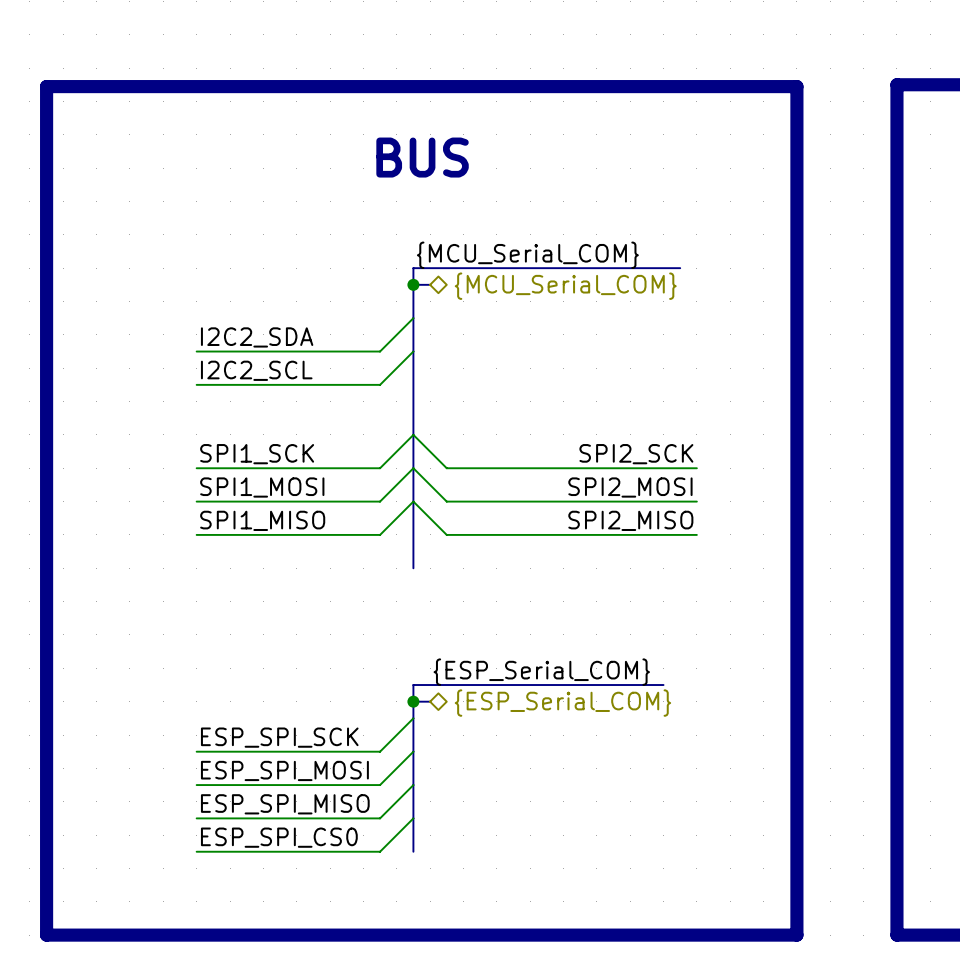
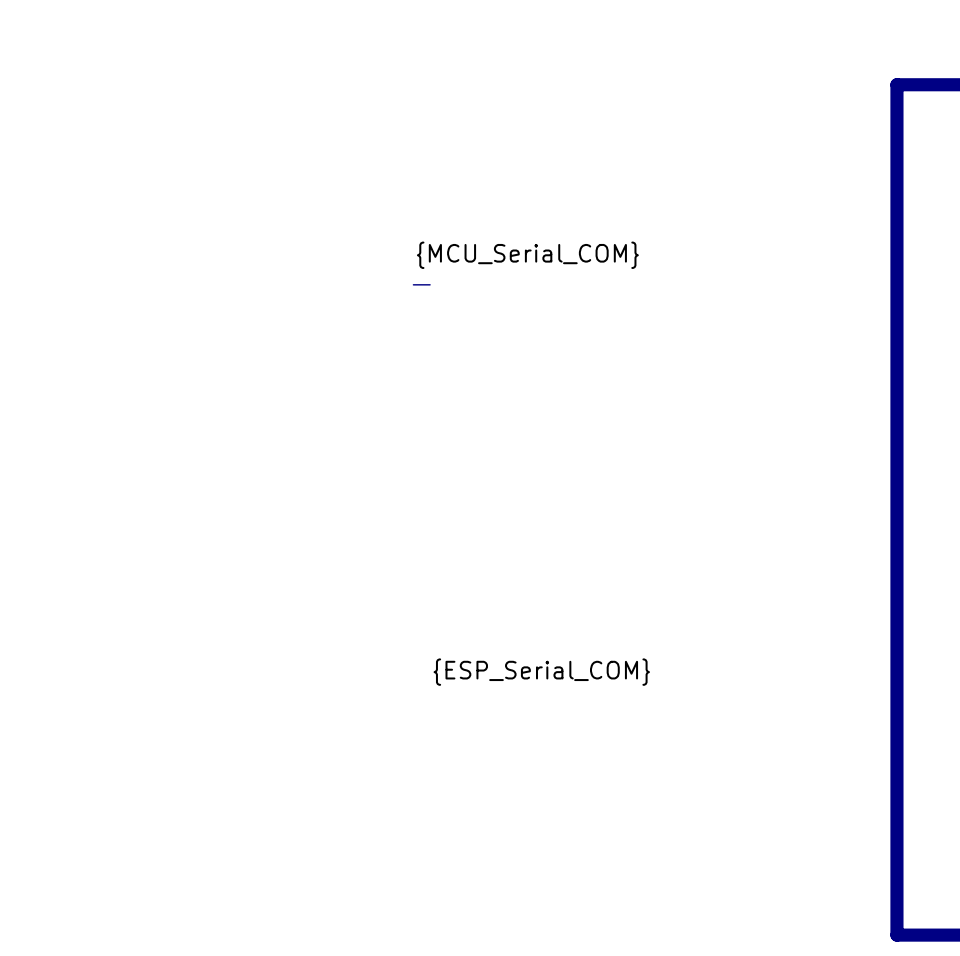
line: (46, 86) (796, 86) (796, 935) (46, 935) (46, 86) -> none
text: BUS (422, 157) -> none
bus: (680, 268) (413, 268) (413, 568) -> none
junction: (413, 284) -> none
hierarchical label: {MCU_Serial_COM} (565, 286) -> none
wire: (413, 318) (380, 351) (196, 351) -> none
label: I2C2_SDA (257, 337) -> none
wire: (413, 351) (380, 384) (196, 384) -> none
label: I2C2_SCL (256, 370) -> none
label: SPI1_SCK (257, 454) -> none
label: SPI2_SCK (636, 454) -> none
wire: (196, 468) (380, 468) (413, 434) (446, 468) (696, 468) -> none
label: SPI1_MOSI (262, 487) -> none
label: SPI2_MOSI (630, 487) -> none
wire: (196, 501) (380, 501) (413, 468) (446, 501) (696, 501) -> none
label: SPI1_MISO (262, 520) -> none
label: SPI2_MISO (630, 520) -> none
wire: (196, 534) (380, 534) (413, 501) (446, 534) (696, 534) -> none
bus: (663, 685) (413, 685) (413, 851) -> none
bus: (413, 701) (430, 701) -> none
junction: (413, 701) -> none
hierarchical label: {ESP_Serial_COM} (562, 703) -> none
wire: (413, 718) (380, 751) (196, 751) -> none
label: ESP_SPI_SCK (279, 737) -> none
wire: (413, 751) (380, 785) (196, 785) -> none
label: ESP_SPI_MOSI (284, 770) -> none
wire: (413, 785) (380, 818) (196, 818) -> none
label: ESP_SPI_MISO (285, 804) -> none
wire: (413, 818) (380, 851) (196, 851) -> none
label: ESP_SPI_CS0 (279, 837) -> none

